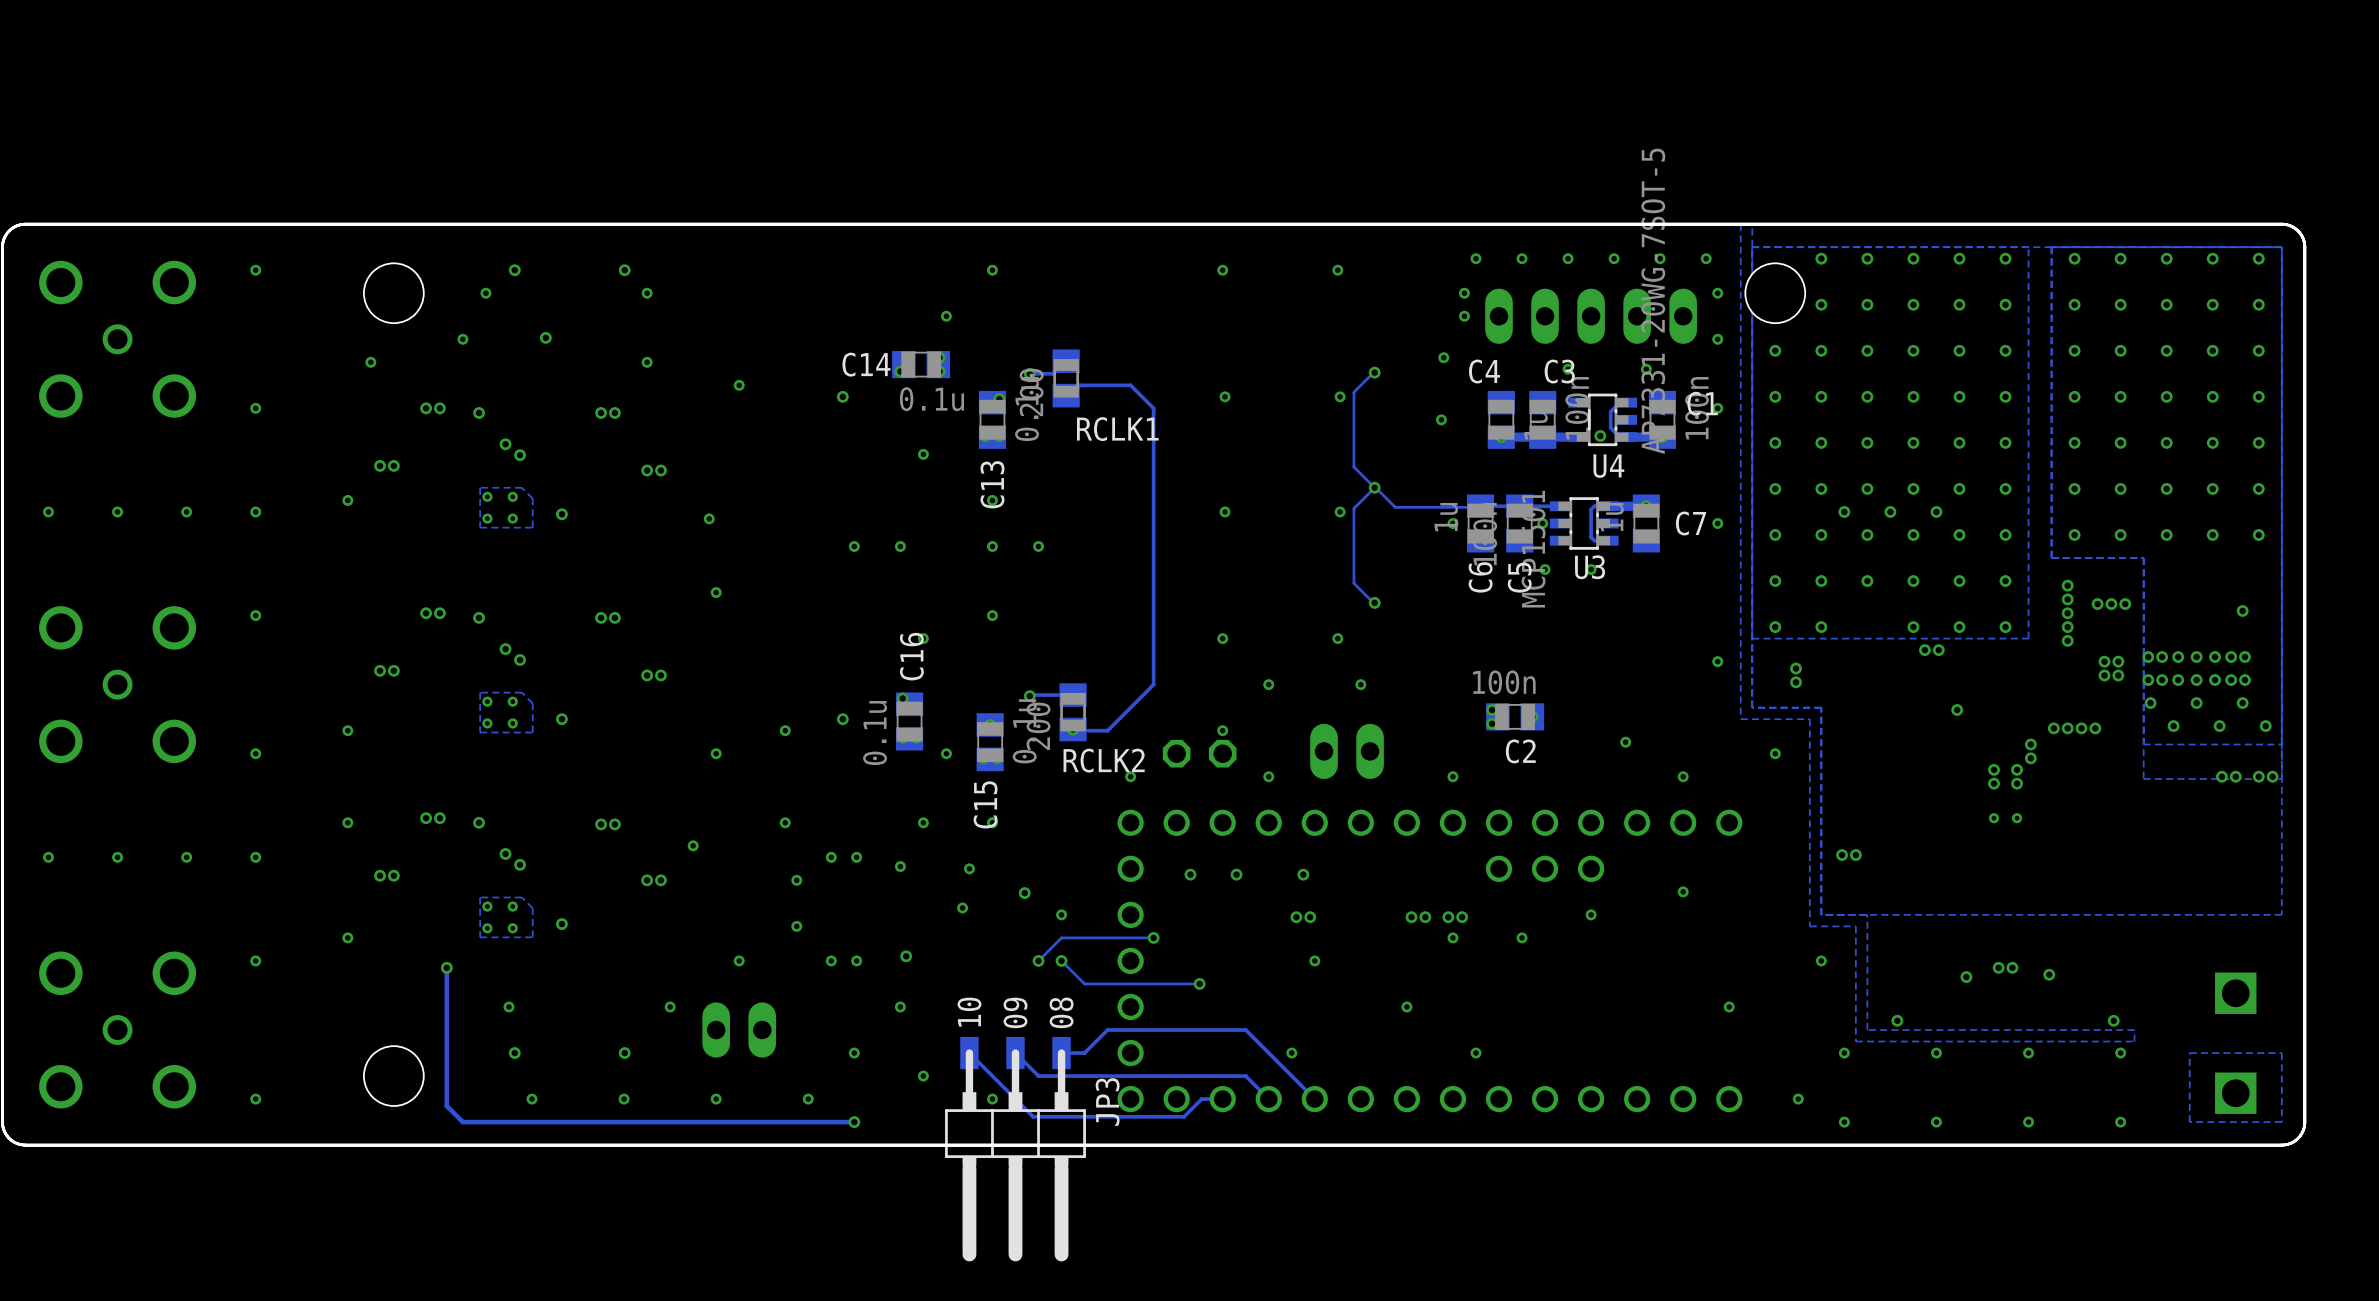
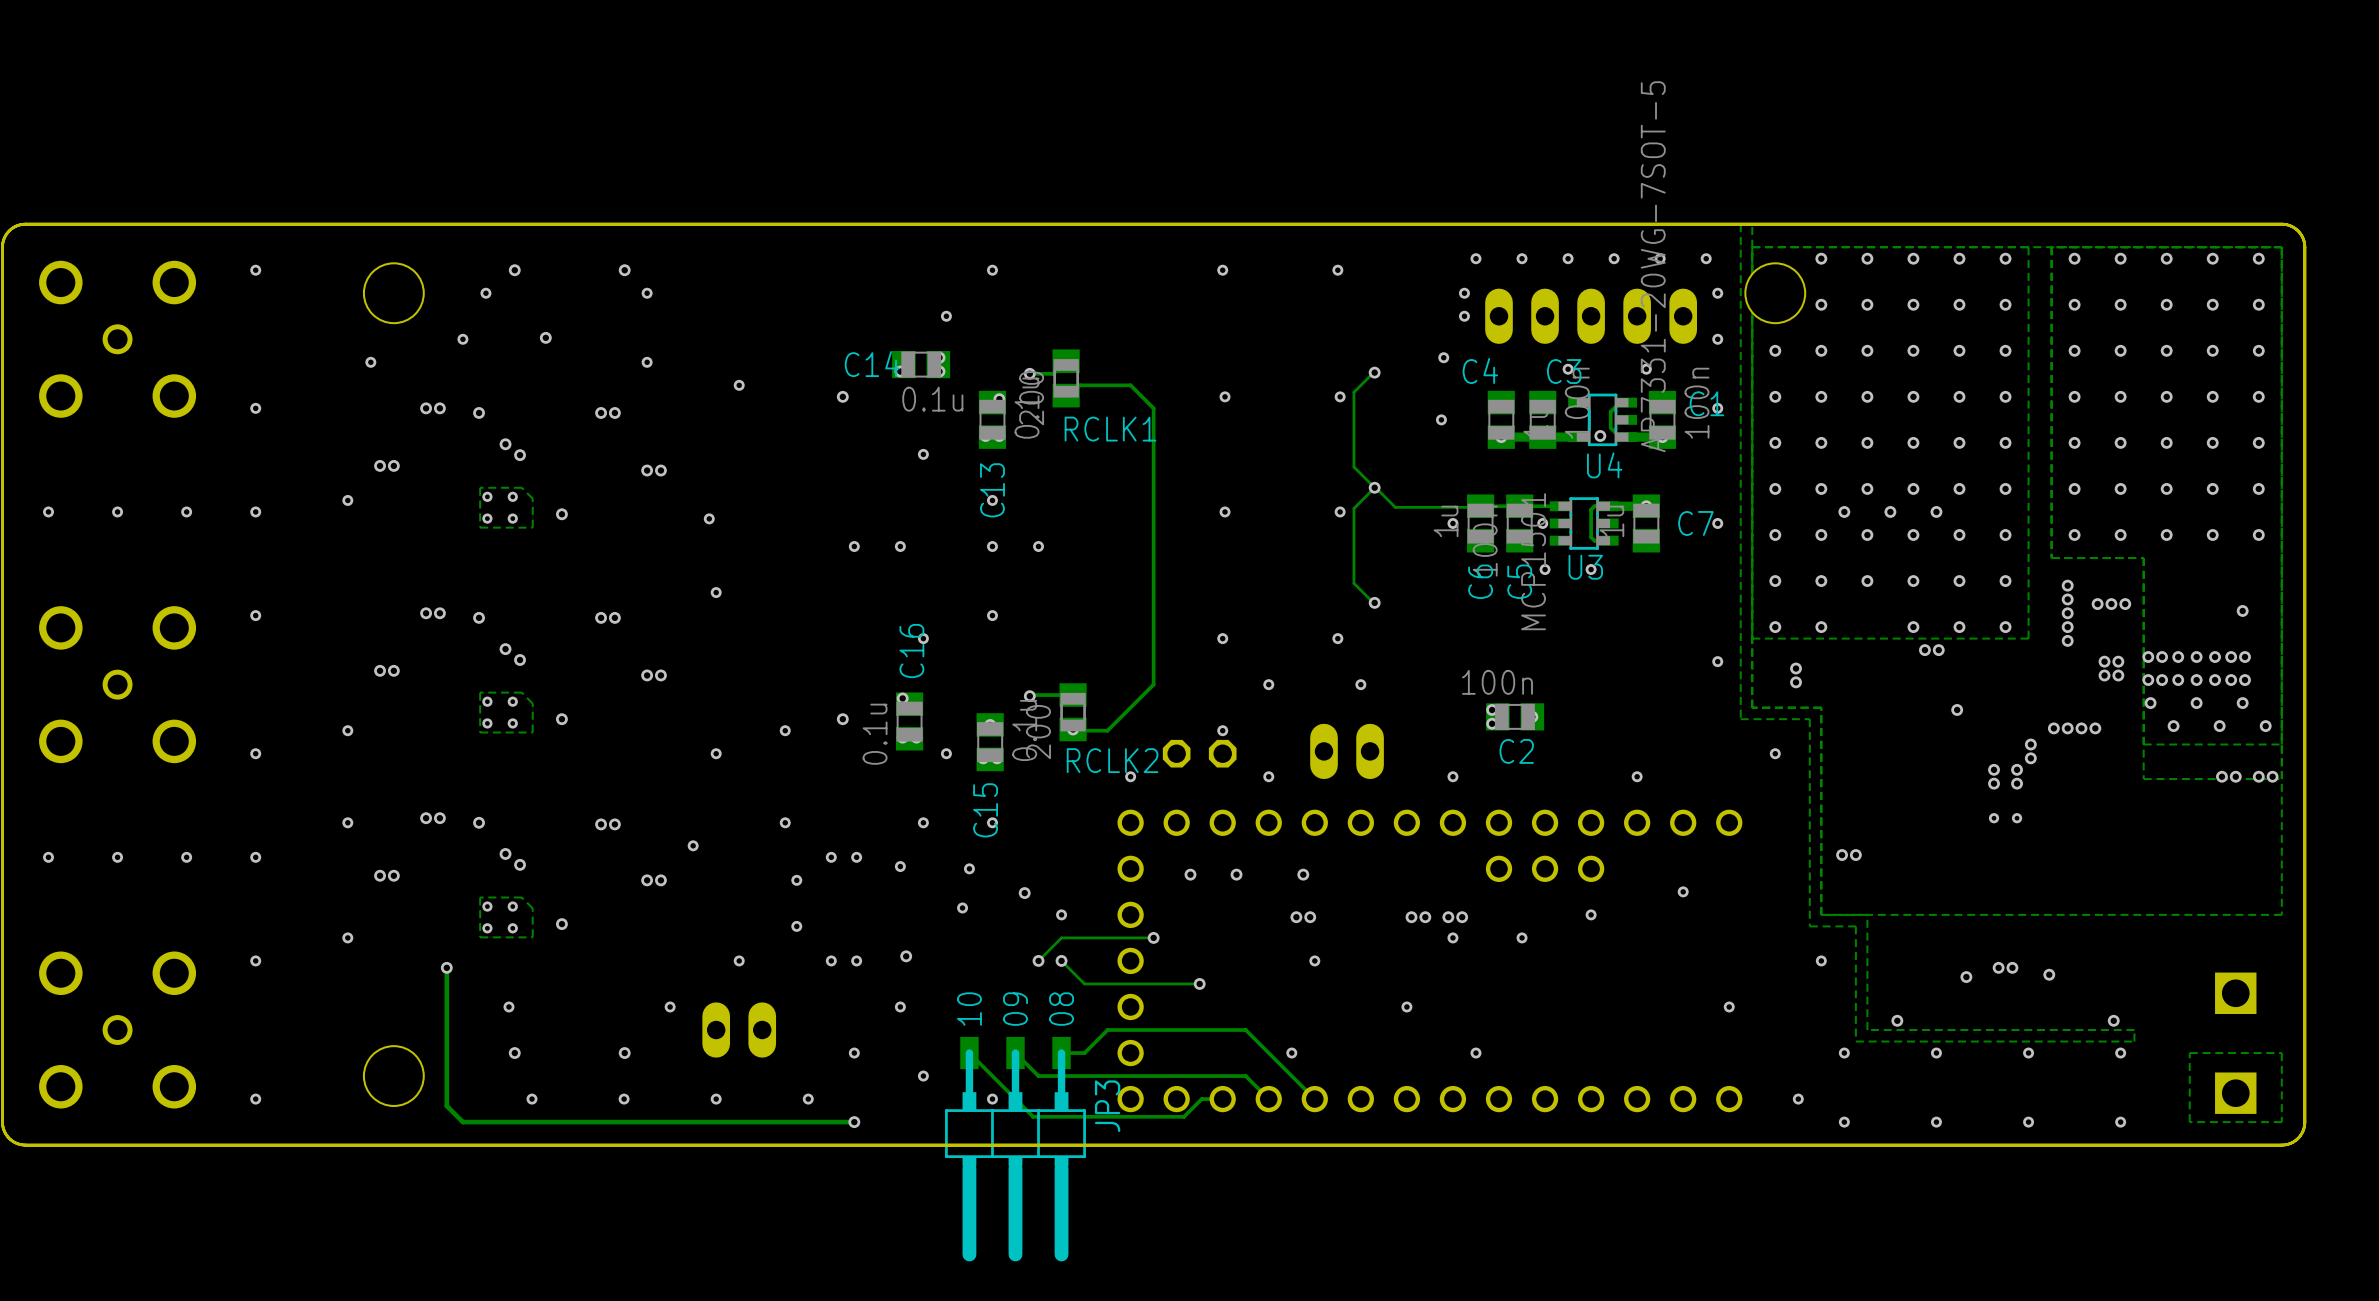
via: (1625, 742) -> none
via: none -> (1637, 776)
via: (1683, 776) -> none

